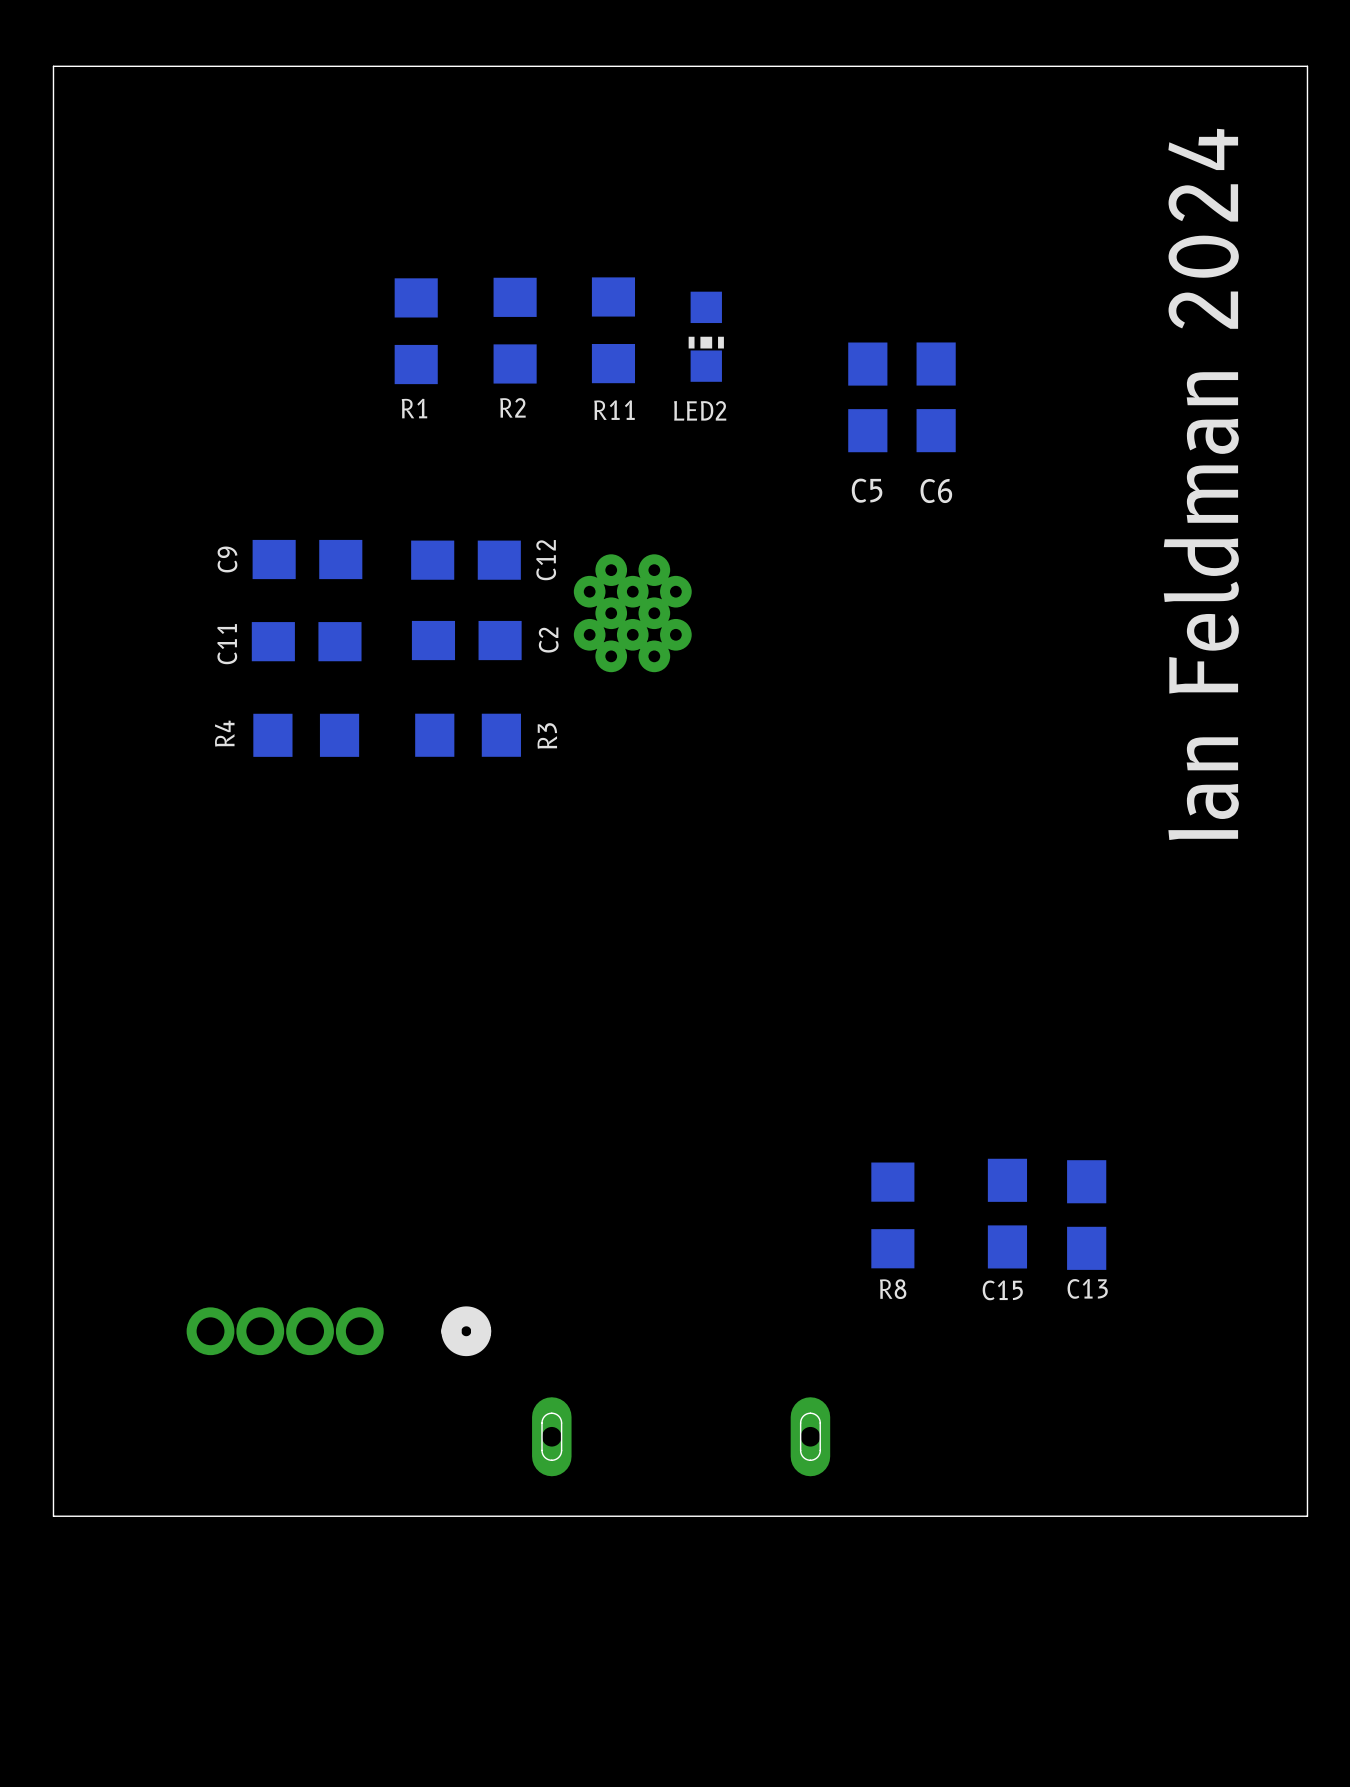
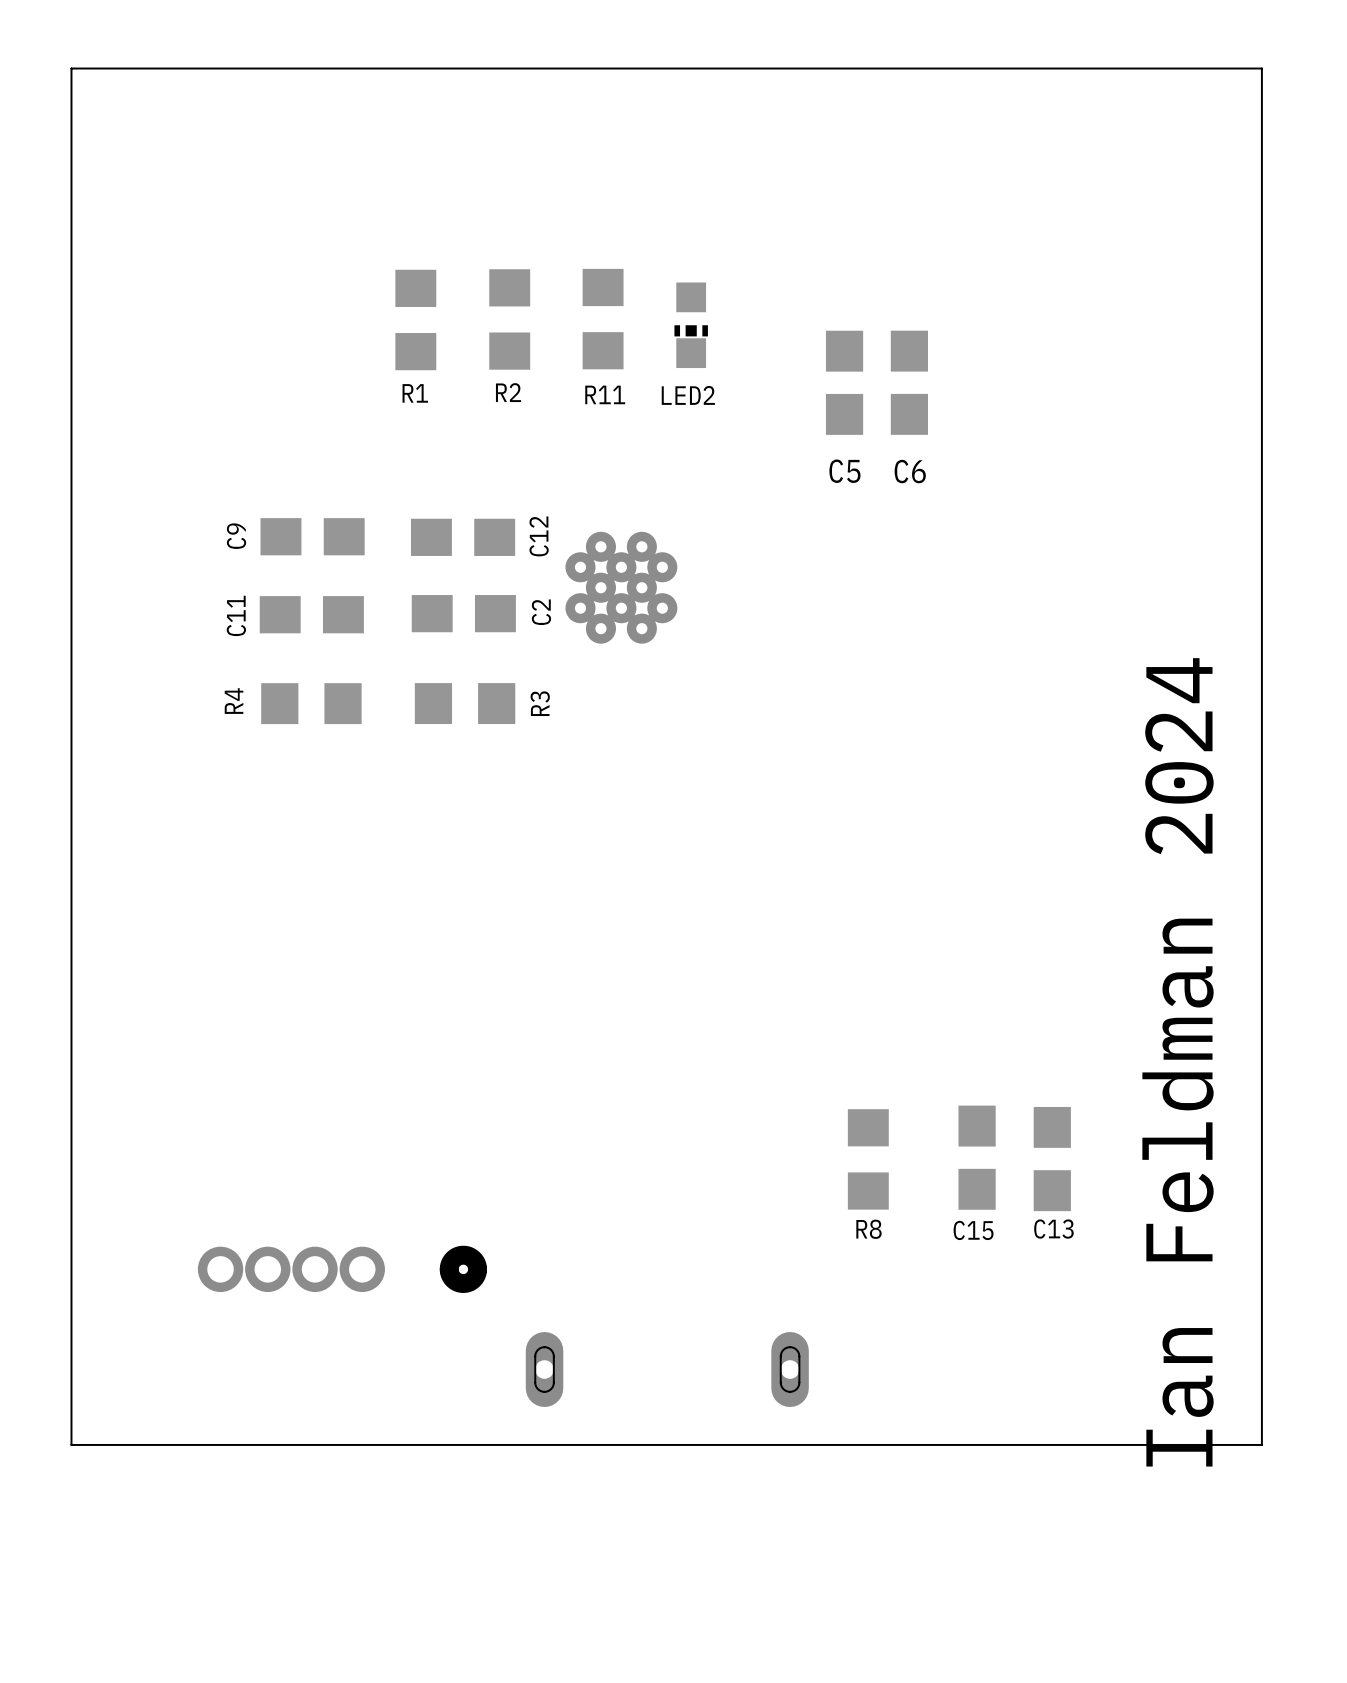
text position: Ian Feldman 2024 (1201, 484) -> Ian Feldman 2024 (1178, 1062)

